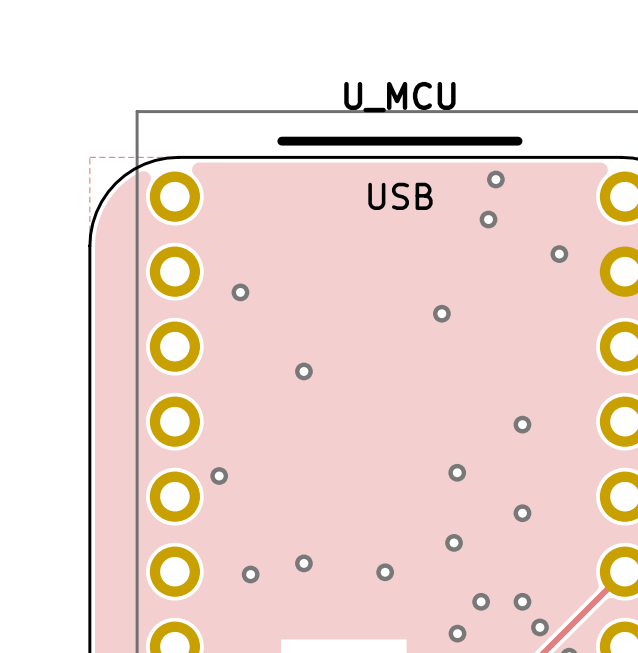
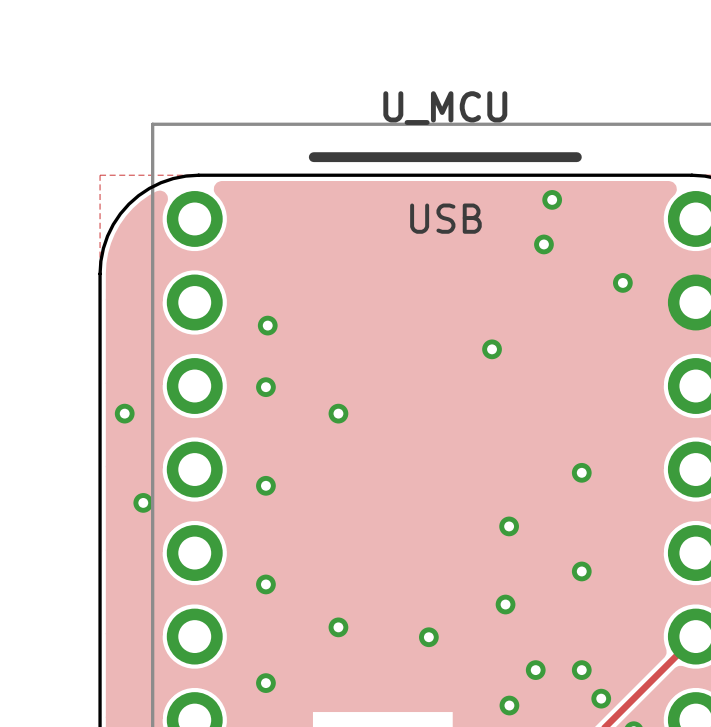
via: none -> (265, 387)
via: none -> (124, 413)
via: none -> (265, 485)
via: none -> (143, 502)
via: (219, 476) -> none
via: none -> (265, 584)
via: (250, 574) -> none
via: none -> (265, 683)

